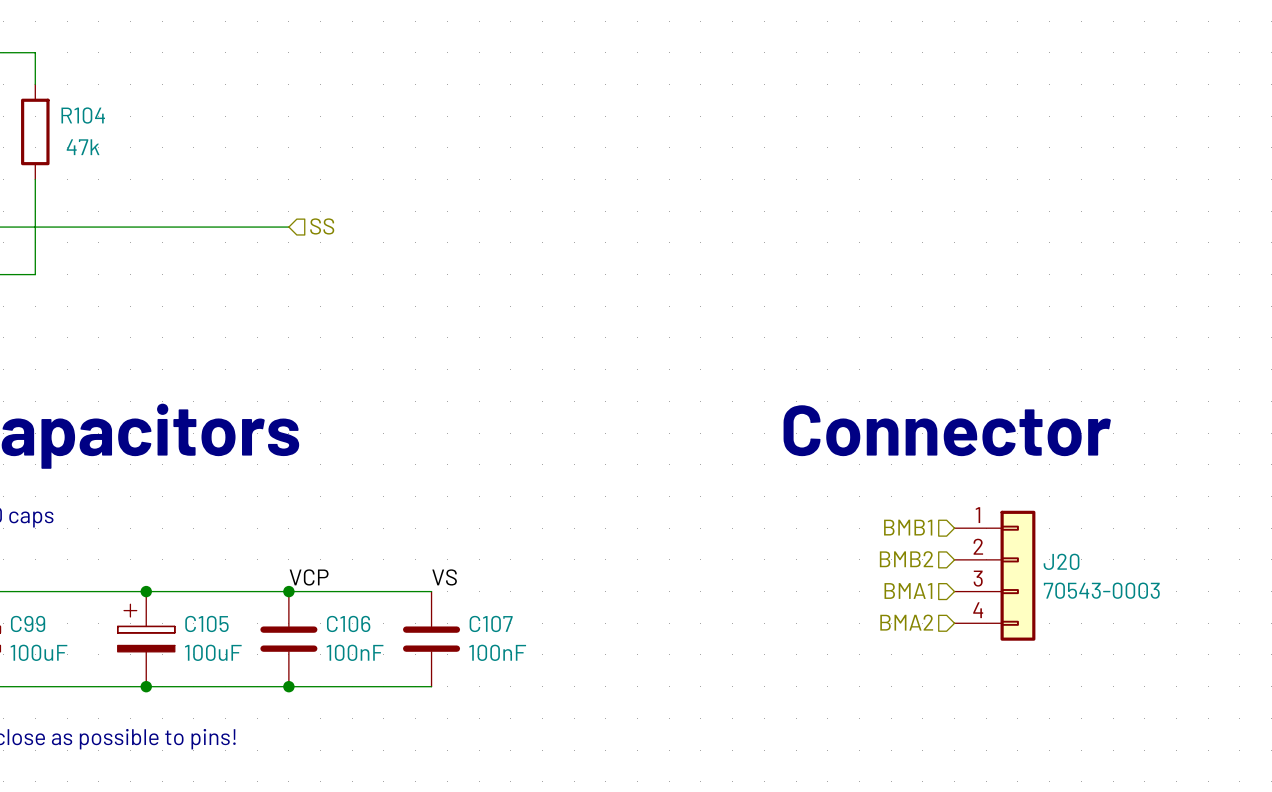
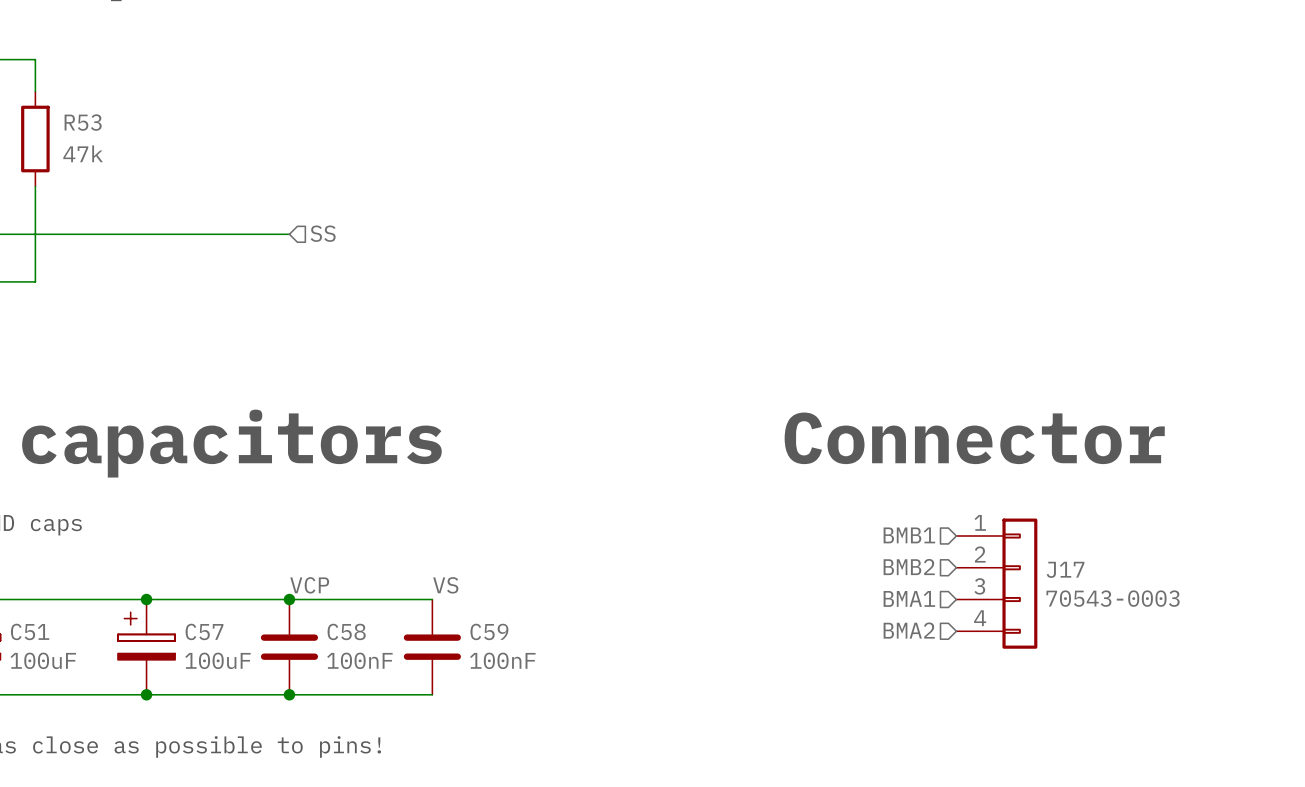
R104 name: R104 (83, 115) -> R53 (83, 122)
J20 name: J20 (1061, 561) -> J17 (1065, 569)
C99 name: C99 (28, 623) -> C51 (30, 631)
C105 name: C105 (206, 623) -> C57 (204, 631)
C106 name: C106 (348, 623) -> C58 (346, 631)
C107 name: C107 (491, 623) -> C59 (489, 631)

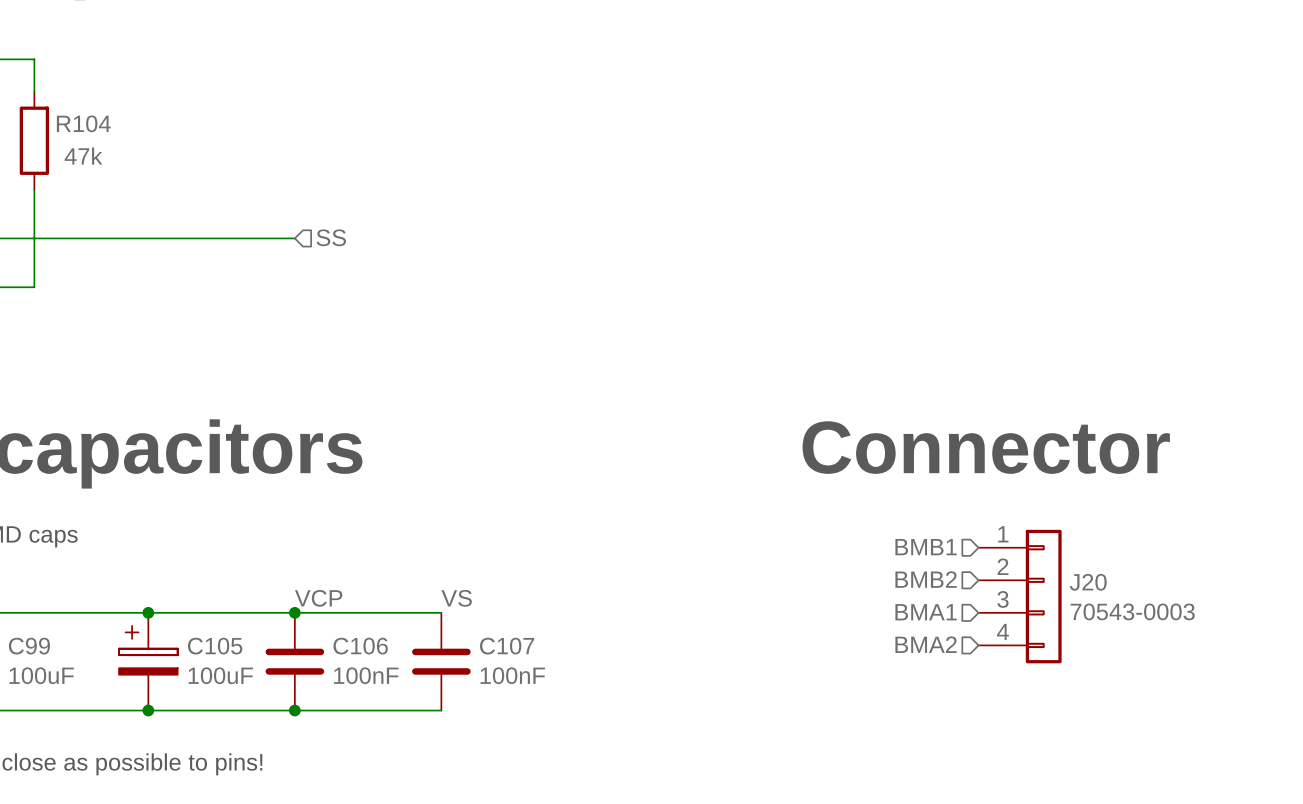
R53 name: R53 (83, 122) -> R104 (83, 123)
J17 name: J17 (1065, 569) -> J20 (1088, 582)
C51 name: C51 (30, 631) -> C99 (29, 646)
C57 name: C57 (204, 631) -> C105 (215, 646)
C58 name: C58 (346, 631) -> C106 (360, 646)
C59 name: C59 (489, 631) -> C107 (507, 646)

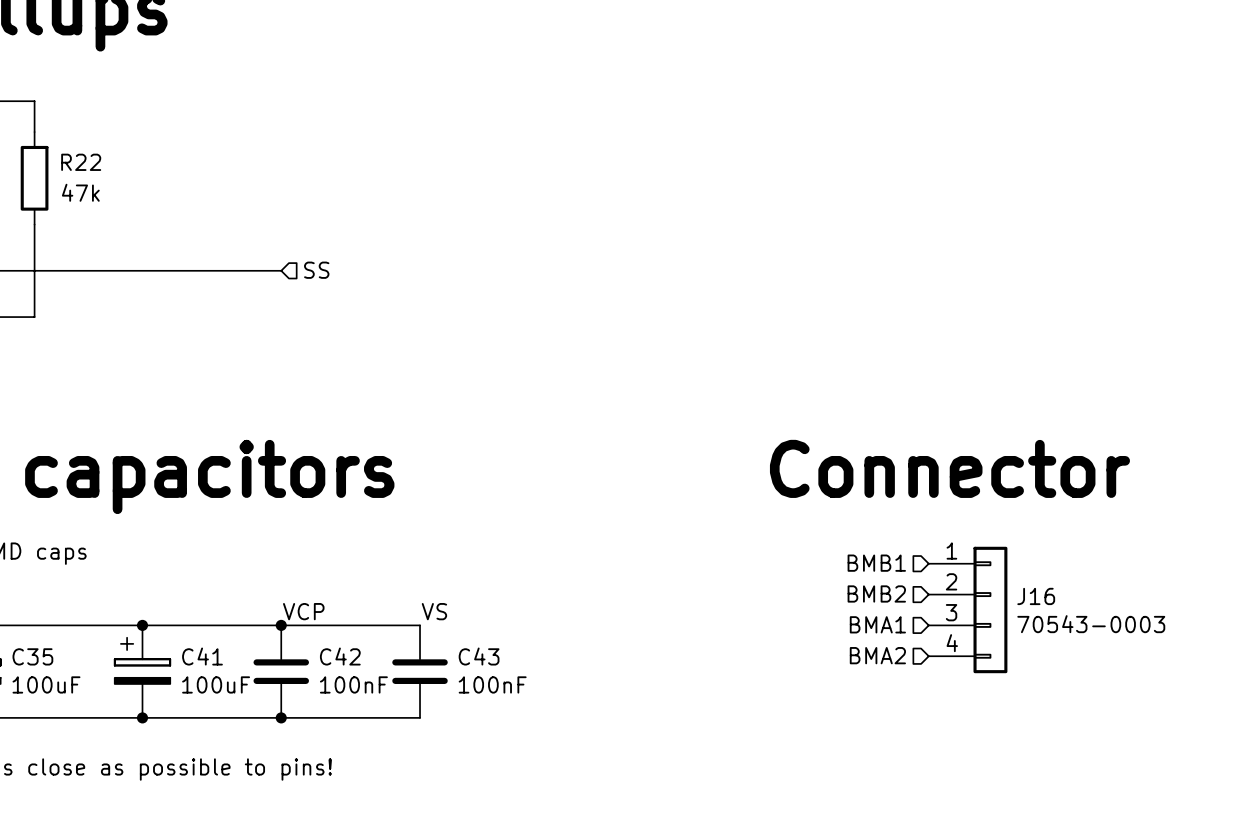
R104 name: R104 (83, 123) -> R22 (81, 162)
J20 name: J20 (1088, 582) -> J16 (1036, 596)
C99 name: C99 (29, 646) -> C35 (32, 656)
C105 name: C105 (215, 646) -> C41 (202, 656)
C106 name: C106 (360, 646) -> C42 (340, 656)
C107 name: C107 (507, 646) -> C43 (479, 656)

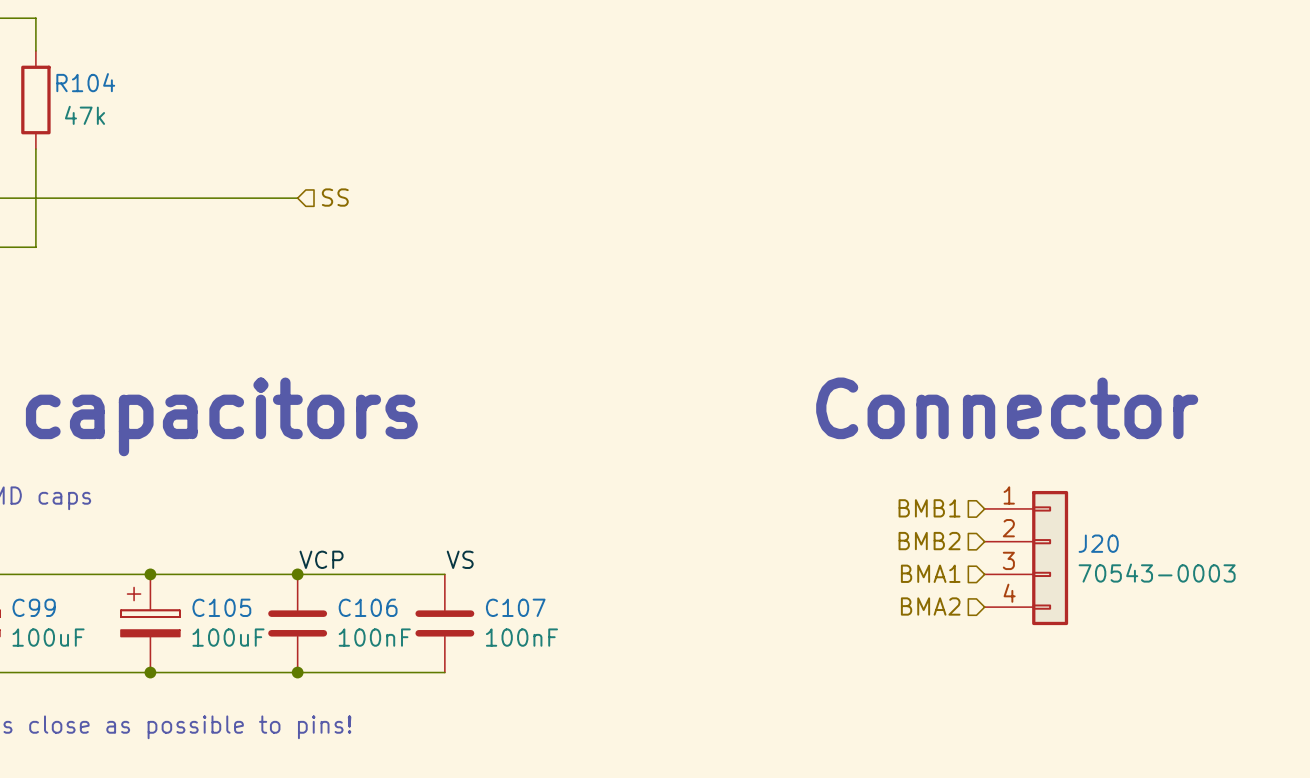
R22 name: R22 (81, 162) -> R104 (85, 82)
J16 name: J16 (1036, 596) -> J20 (1098, 543)
C35 name: C35 (32, 656) -> C99 (34, 607)
C41 name: C41 (202, 656) -> C105 (221, 607)
C42 name: C42 (340, 656) -> C106 (368, 607)
C43 name: C43 (479, 656) -> C107 (515, 607)

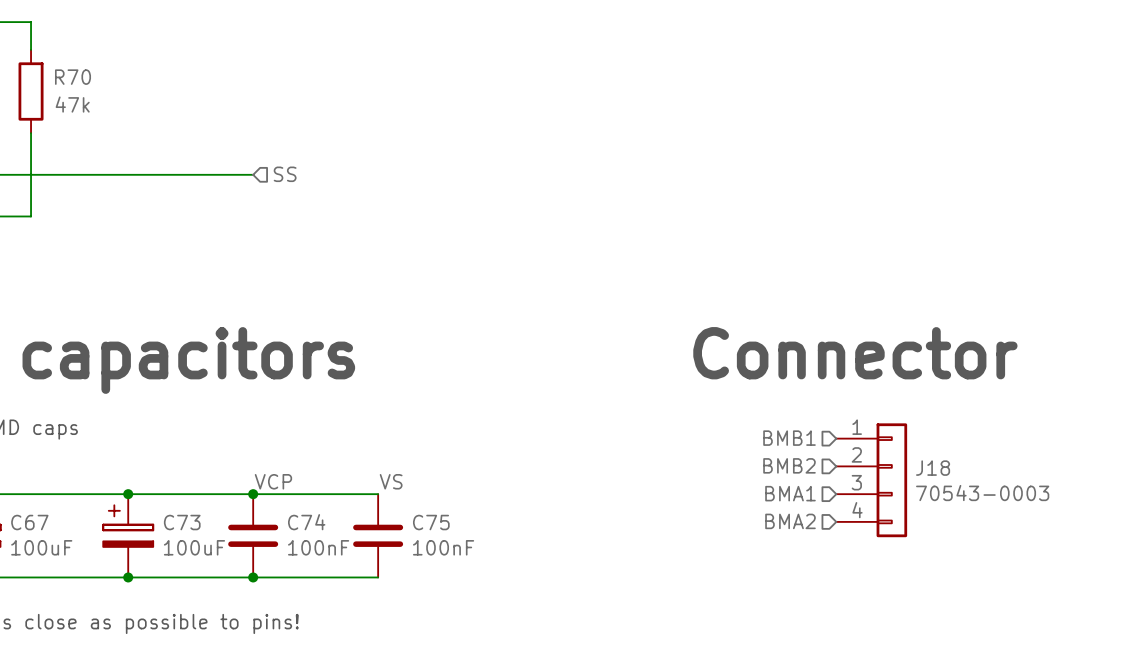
R104 name: R104 (85, 82) -> R70 (73, 77)
J20 name: J20 (1098, 543) -> J18 (933, 468)
C99 name: C99 (34, 607) -> C67 (29, 522)
C105 name: C105 (221, 607) -> C73 (182, 522)
C106 name: C106 (368, 607) -> C74 (306, 522)
C107 name: C107 (515, 607) -> C75 (431, 522)

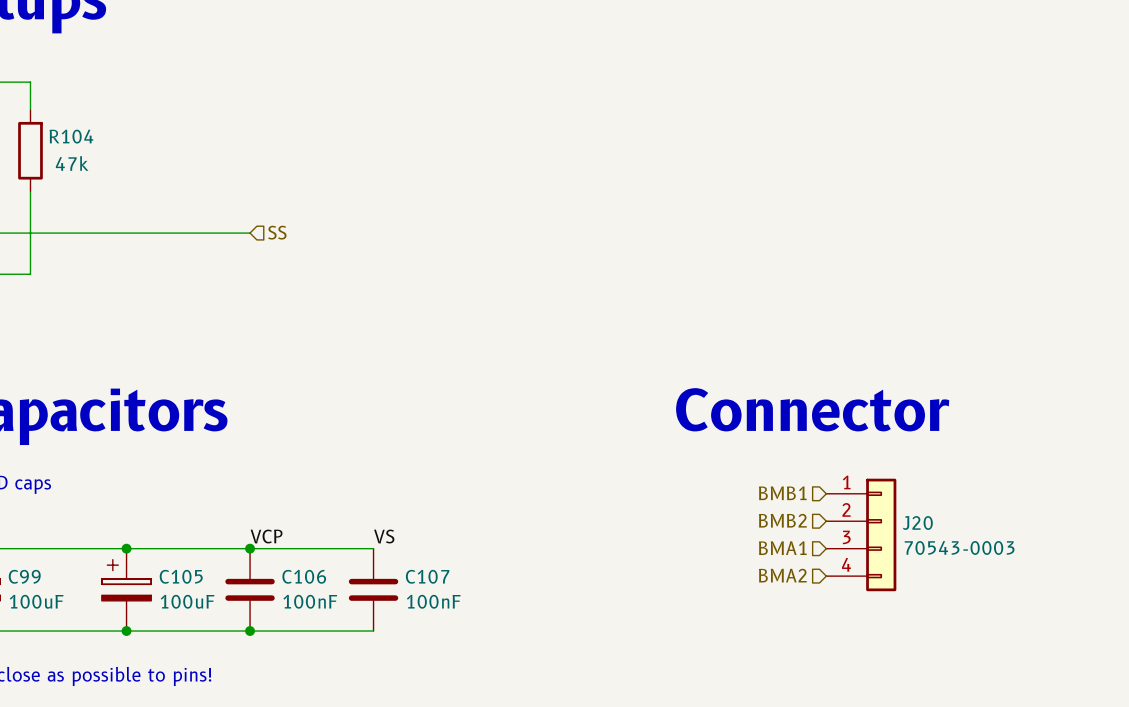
R70 name: R70 (73, 77) -> R104 (71, 136)
J18 name: J18 (933, 468) -> J20 (917, 522)
C67 name: C67 (29, 522) -> C99 (24, 576)
C73 name: C73 (182, 522) -> C105 (181, 576)
C74 name: C74 (306, 522) -> C106 (304, 576)
C75 name: C75 (431, 522) -> C107 (427, 576)

